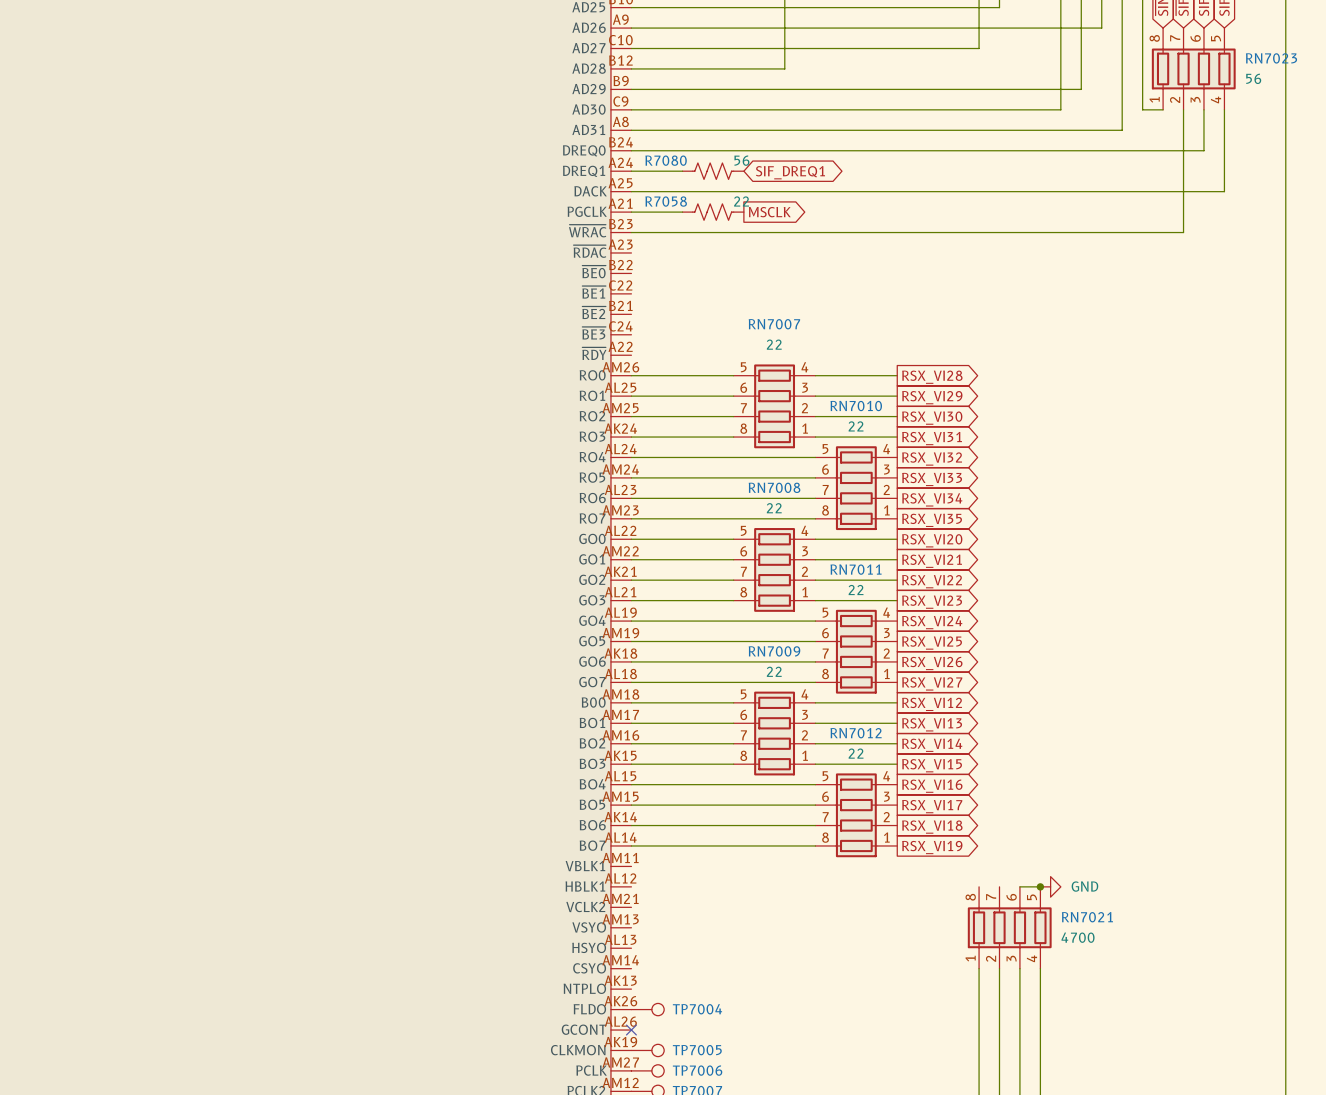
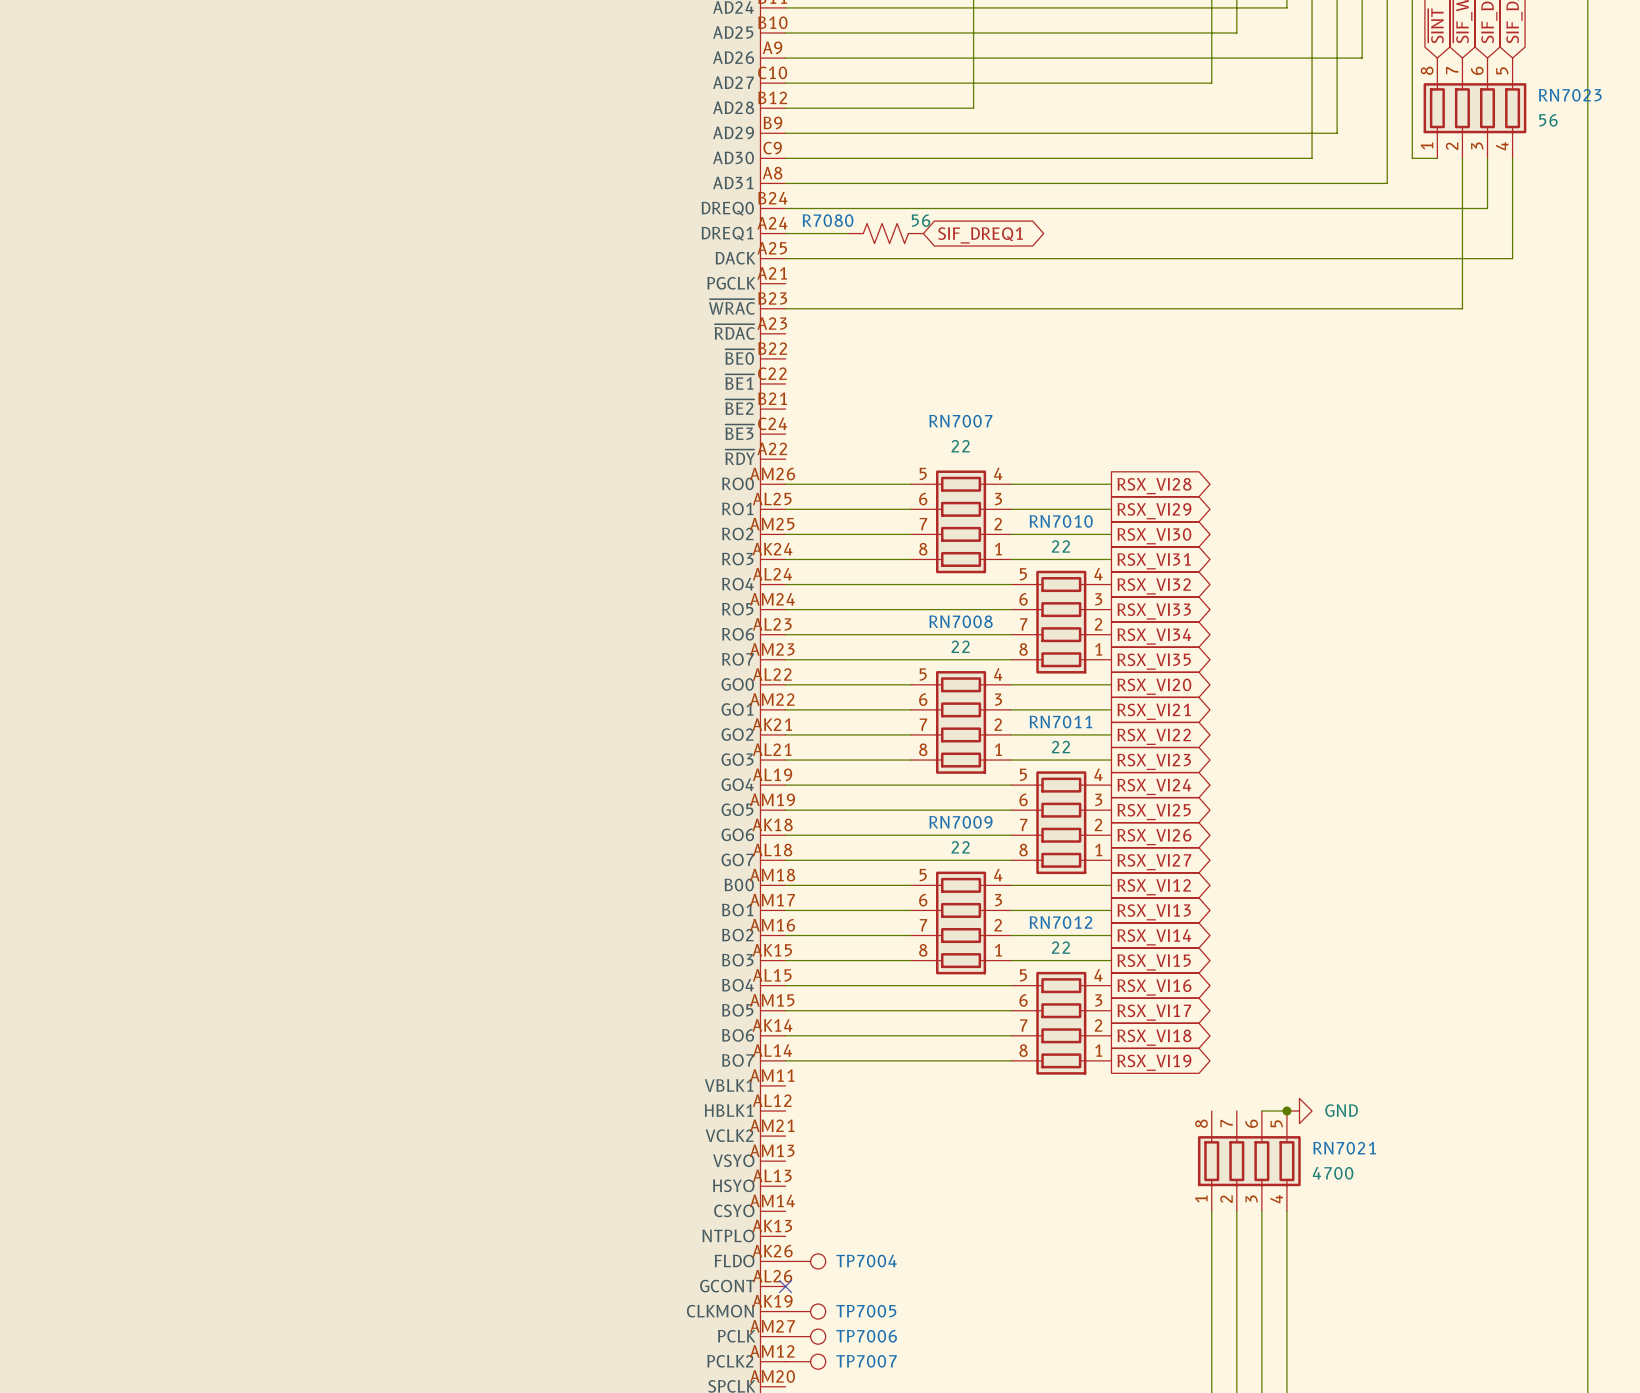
wire: (631, 212) (682, 212) -> none
R7058: 22 (713, 212) -> none
global label: MSCLK (769, 212) -> none

